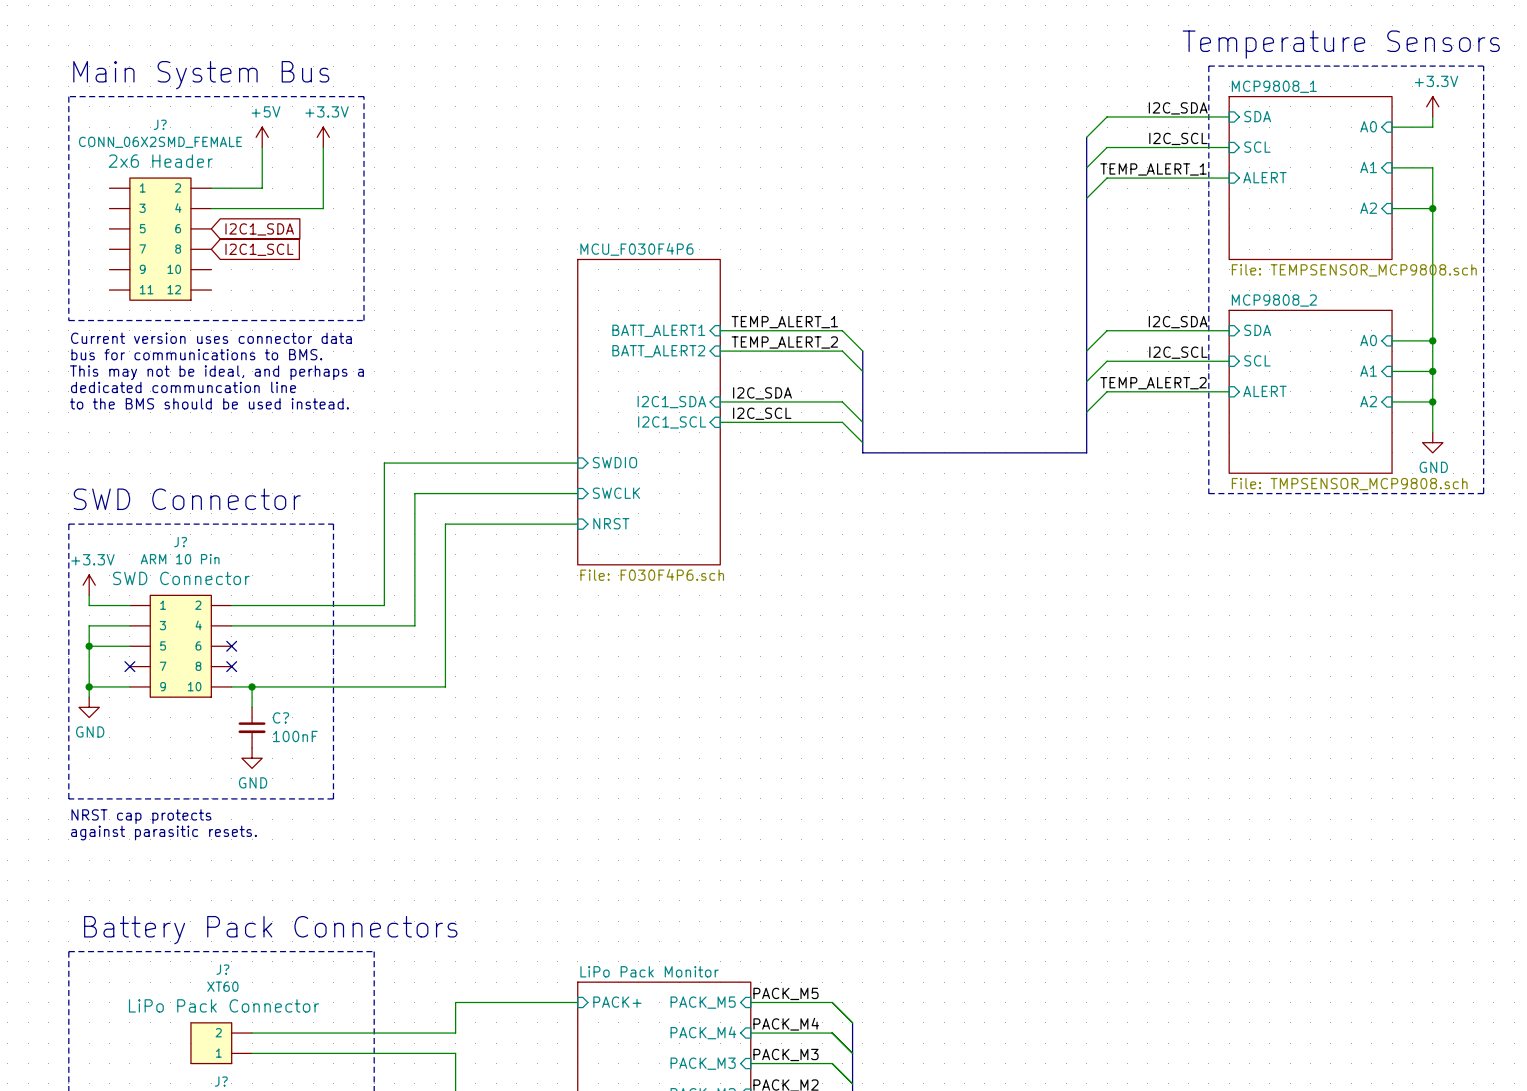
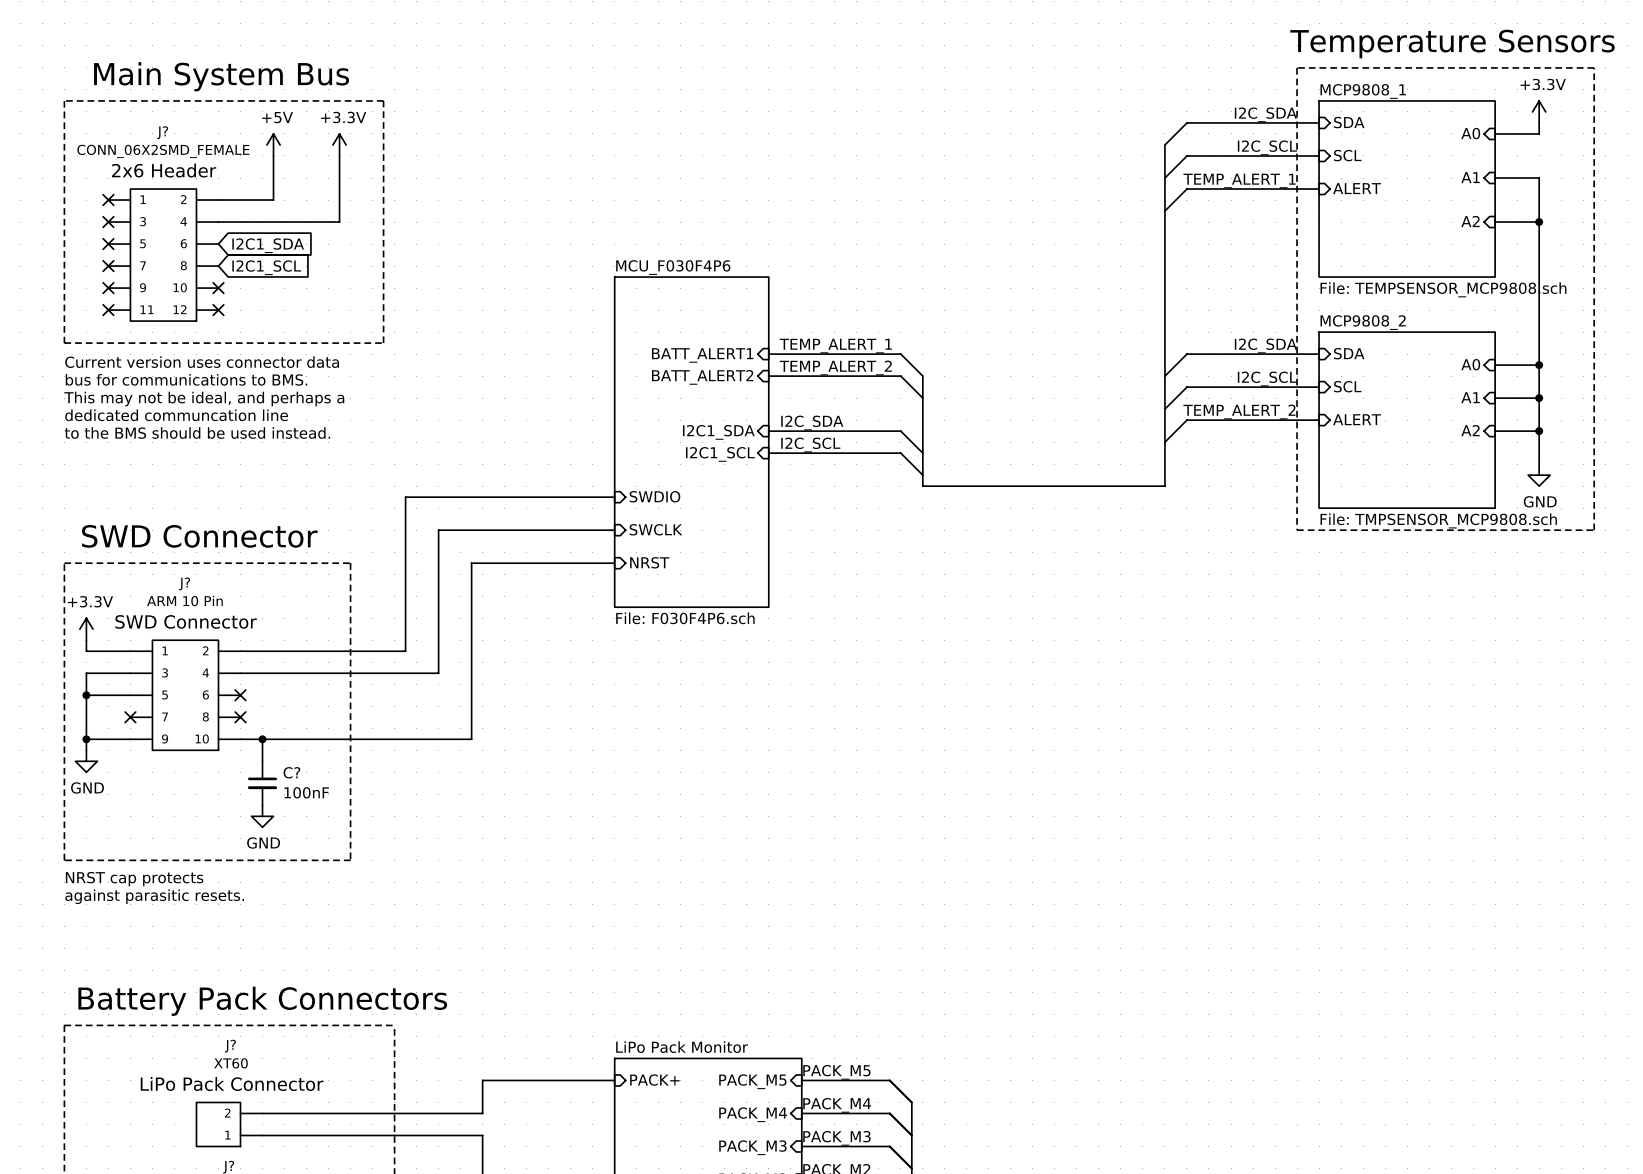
no-connect mark: none -> (108, 200)
no-connect mark: none -> (108, 222)
no-connect mark: none -> (108, 244)
no-connect mark: none -> (108, 266)
no-connect mark: none -> (108, 288)
no-connect mark: none -> (218, 288)
no-connect mark: none -> (108, 310)
no-connect mark: none -> (218, 310)

